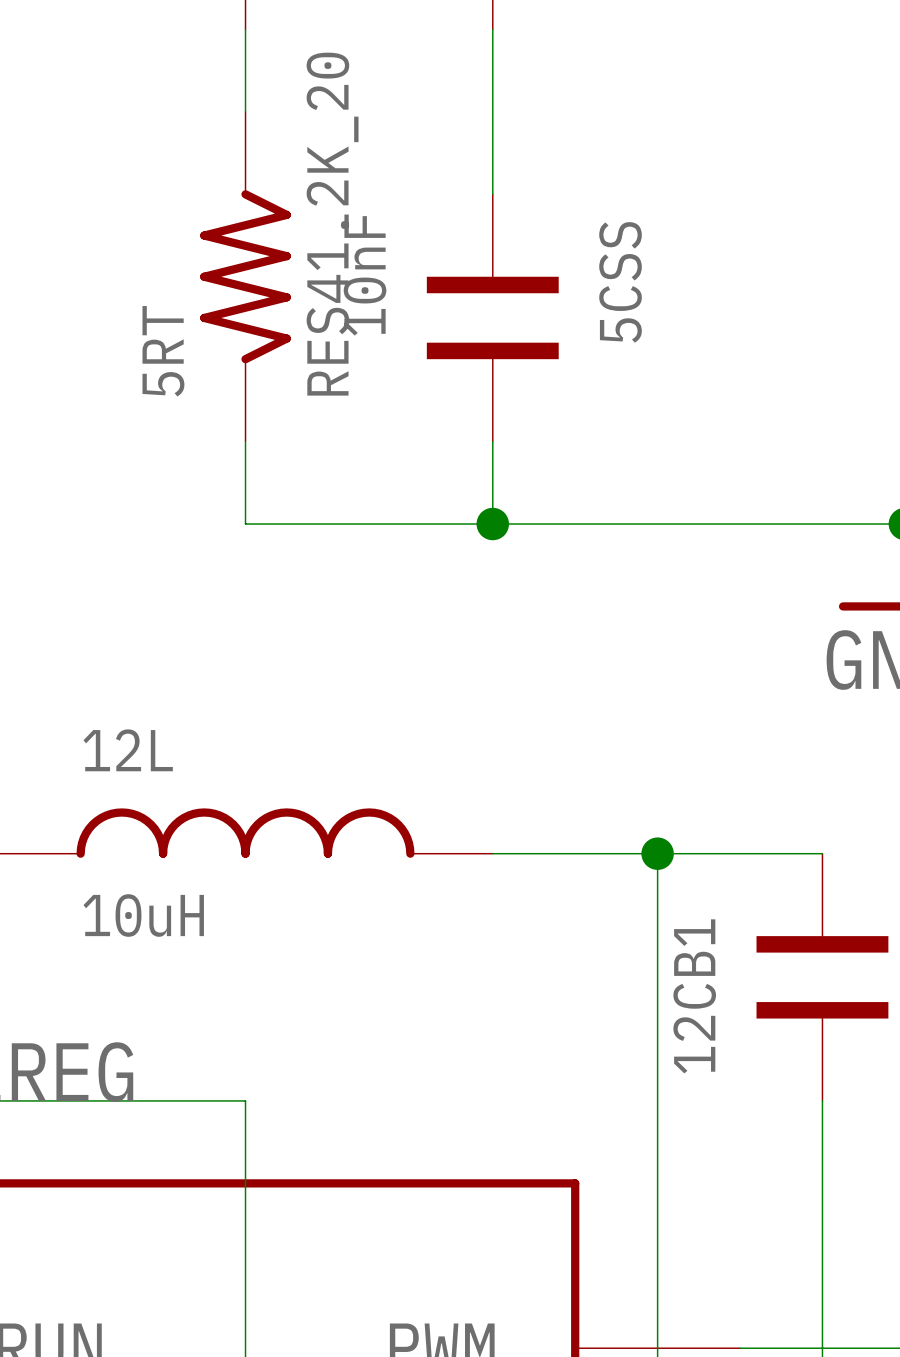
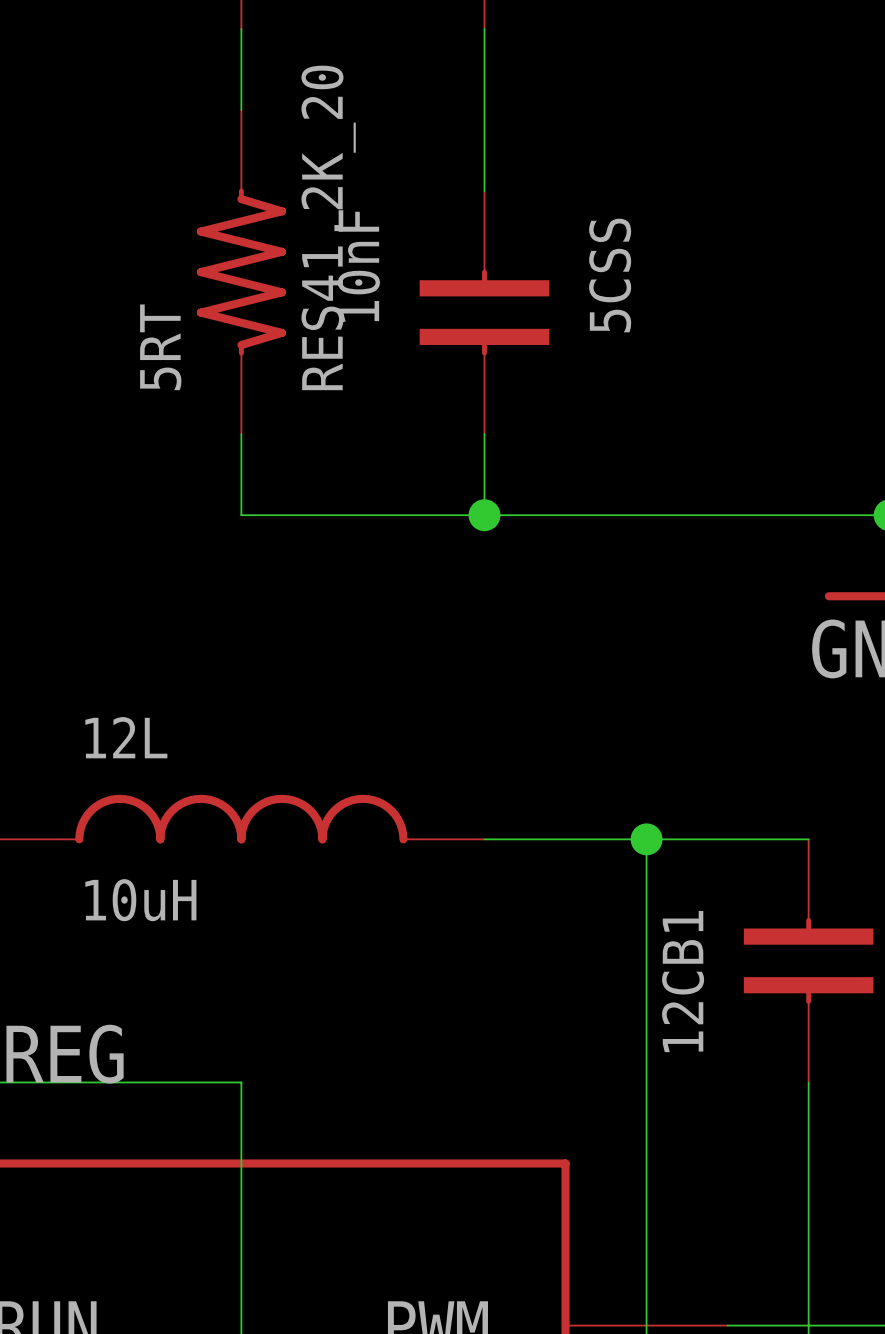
5RT symbol: [200, 111, 291, 442] -> [196, 110, 286, 435]
5CSS symbol: [426, 194, 559, 442] -> [419, 191, 550, 435]
12CB1 symbol: [756, 853, 889, 1101] -> [743, 839, 874, 1083]

